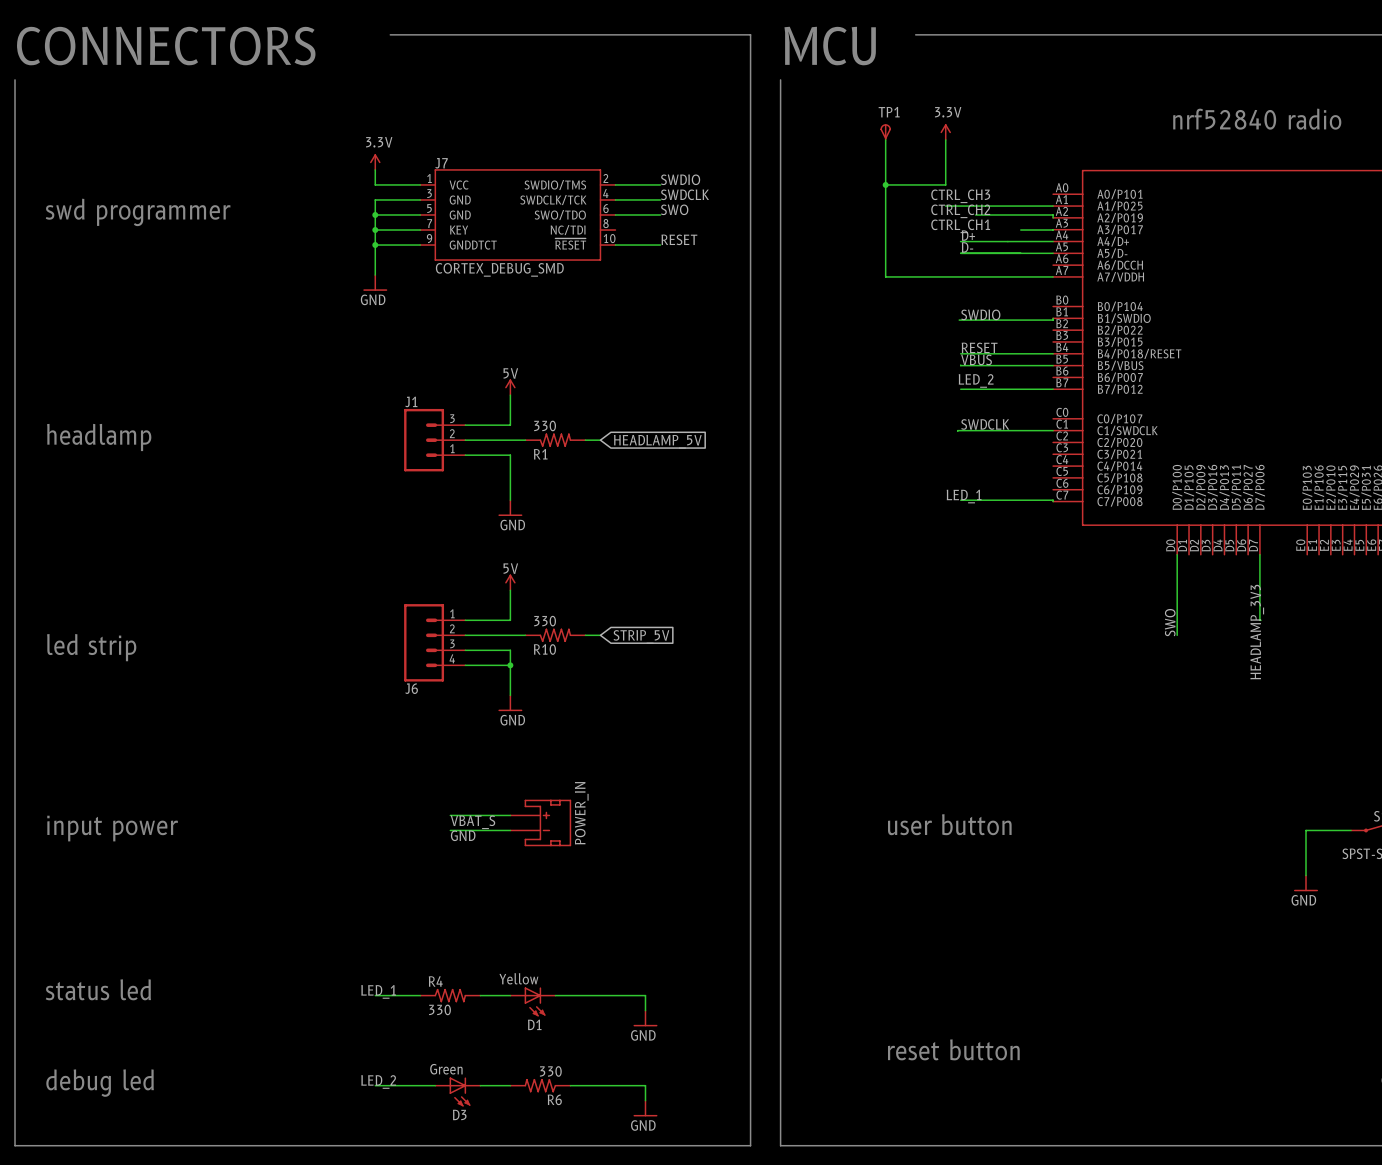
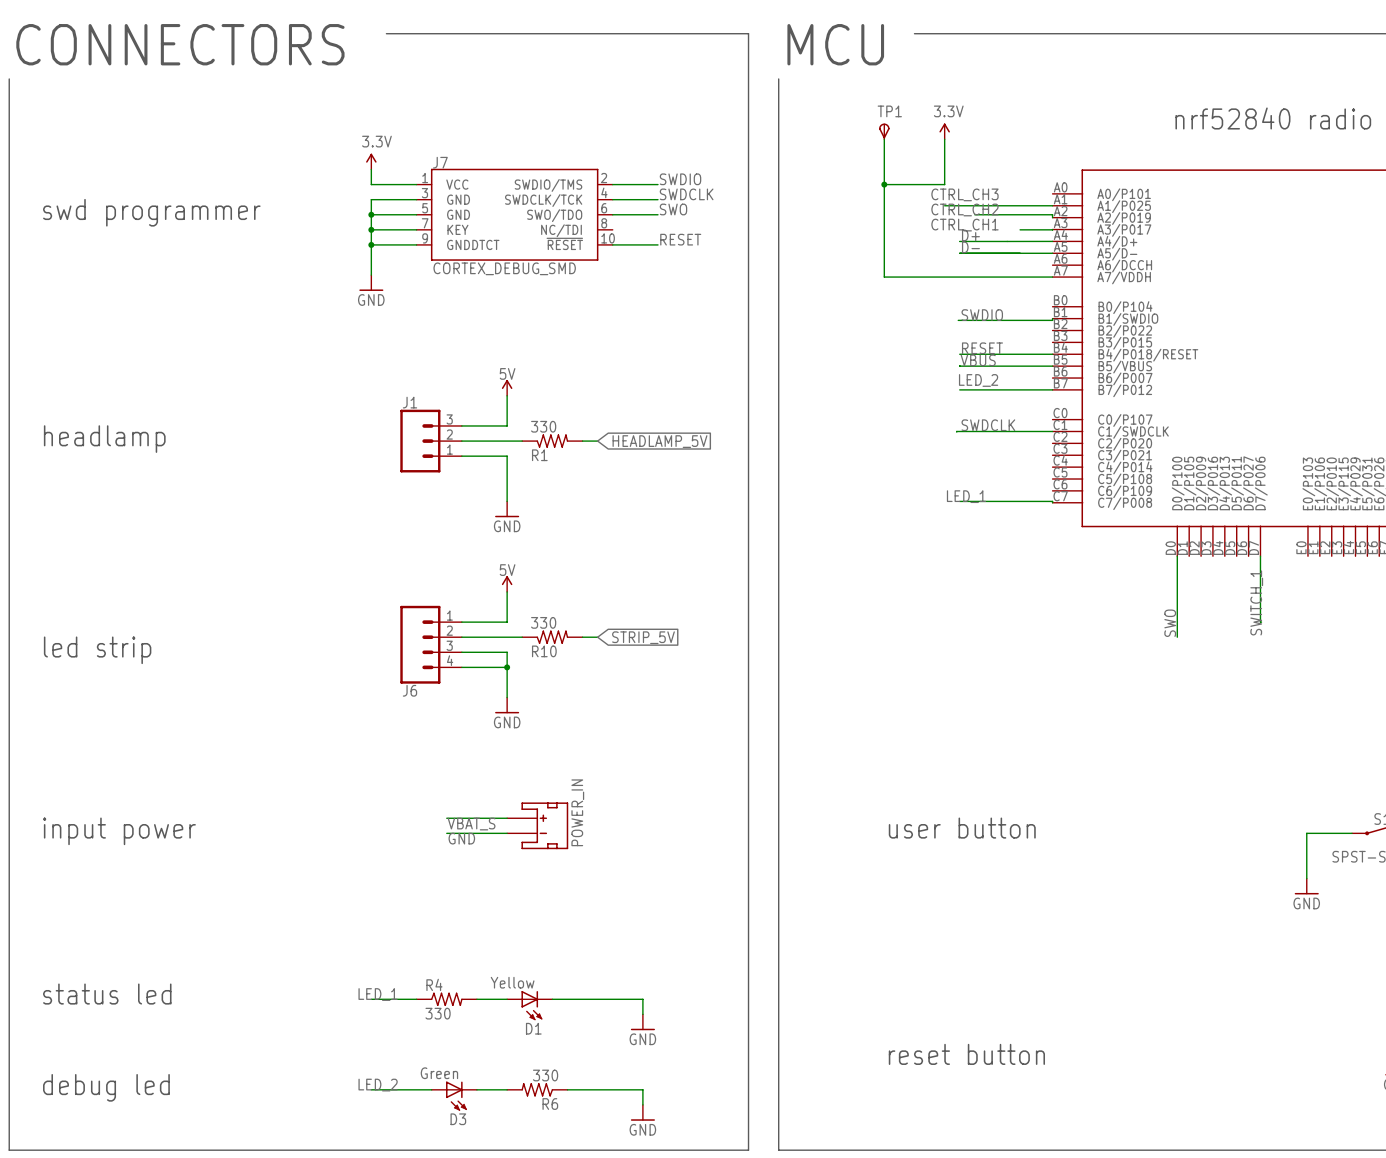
label: none -> SWITCH_1 (1256, 602)
label: HEADLAMP_3V3 (1257, 632) -> none

